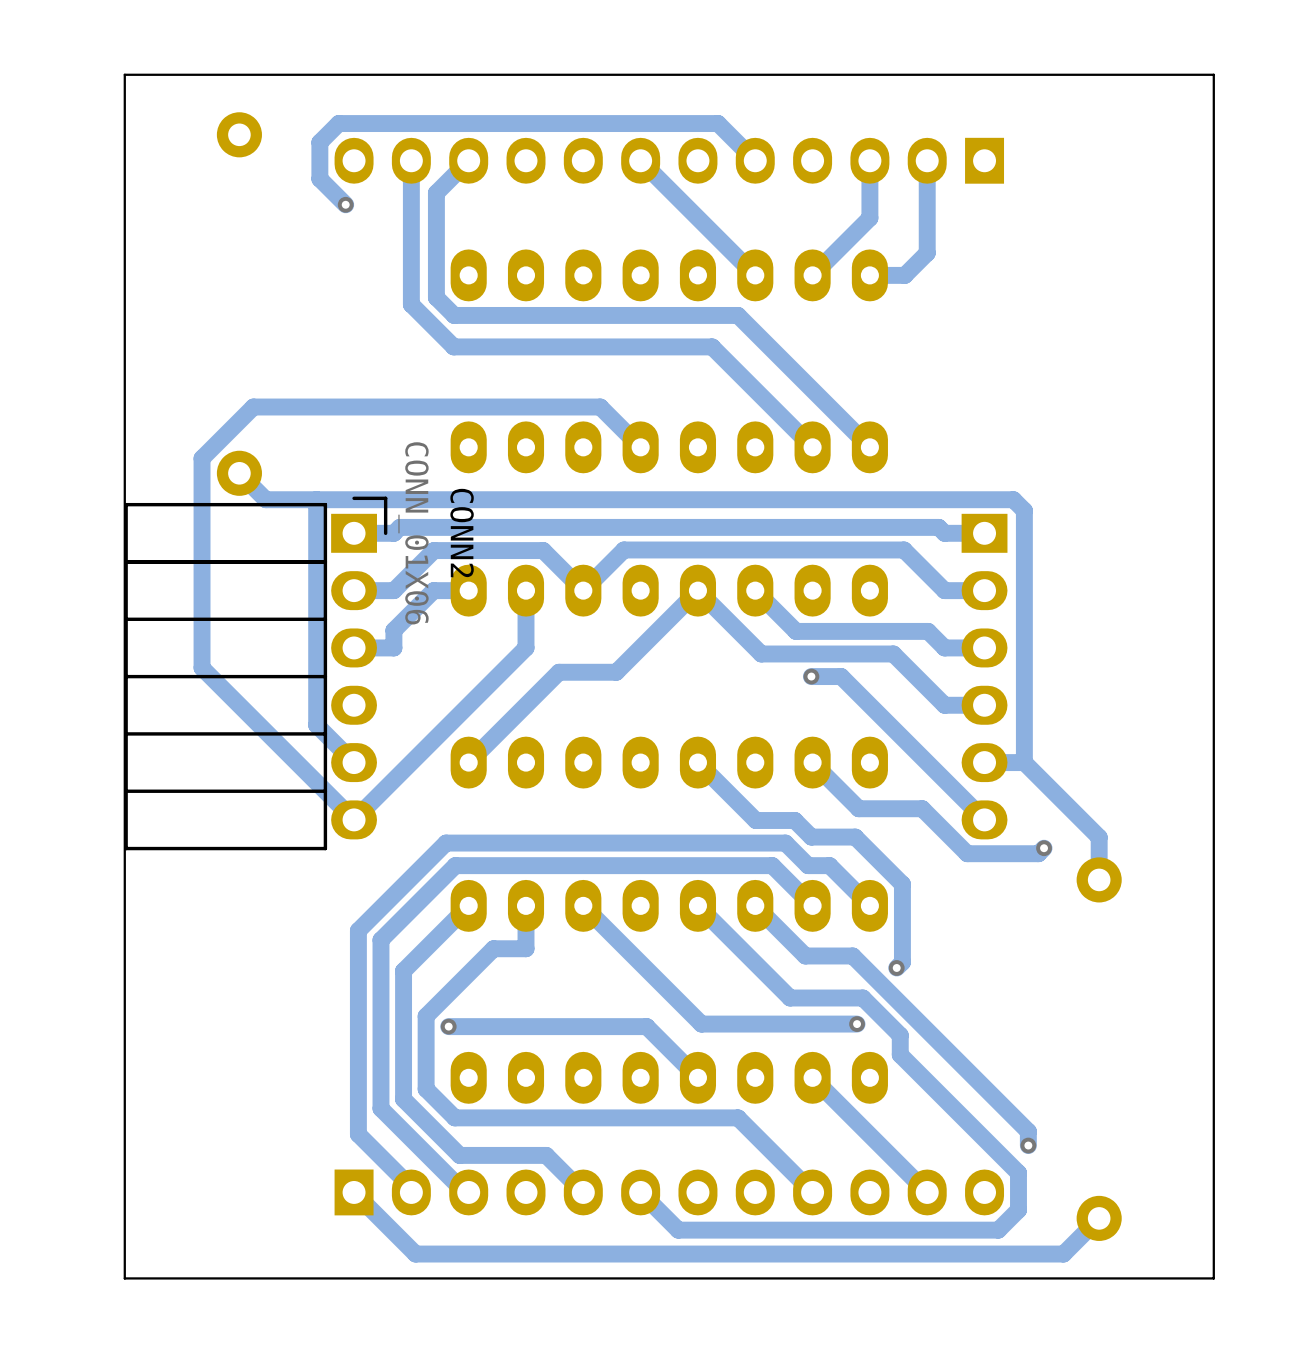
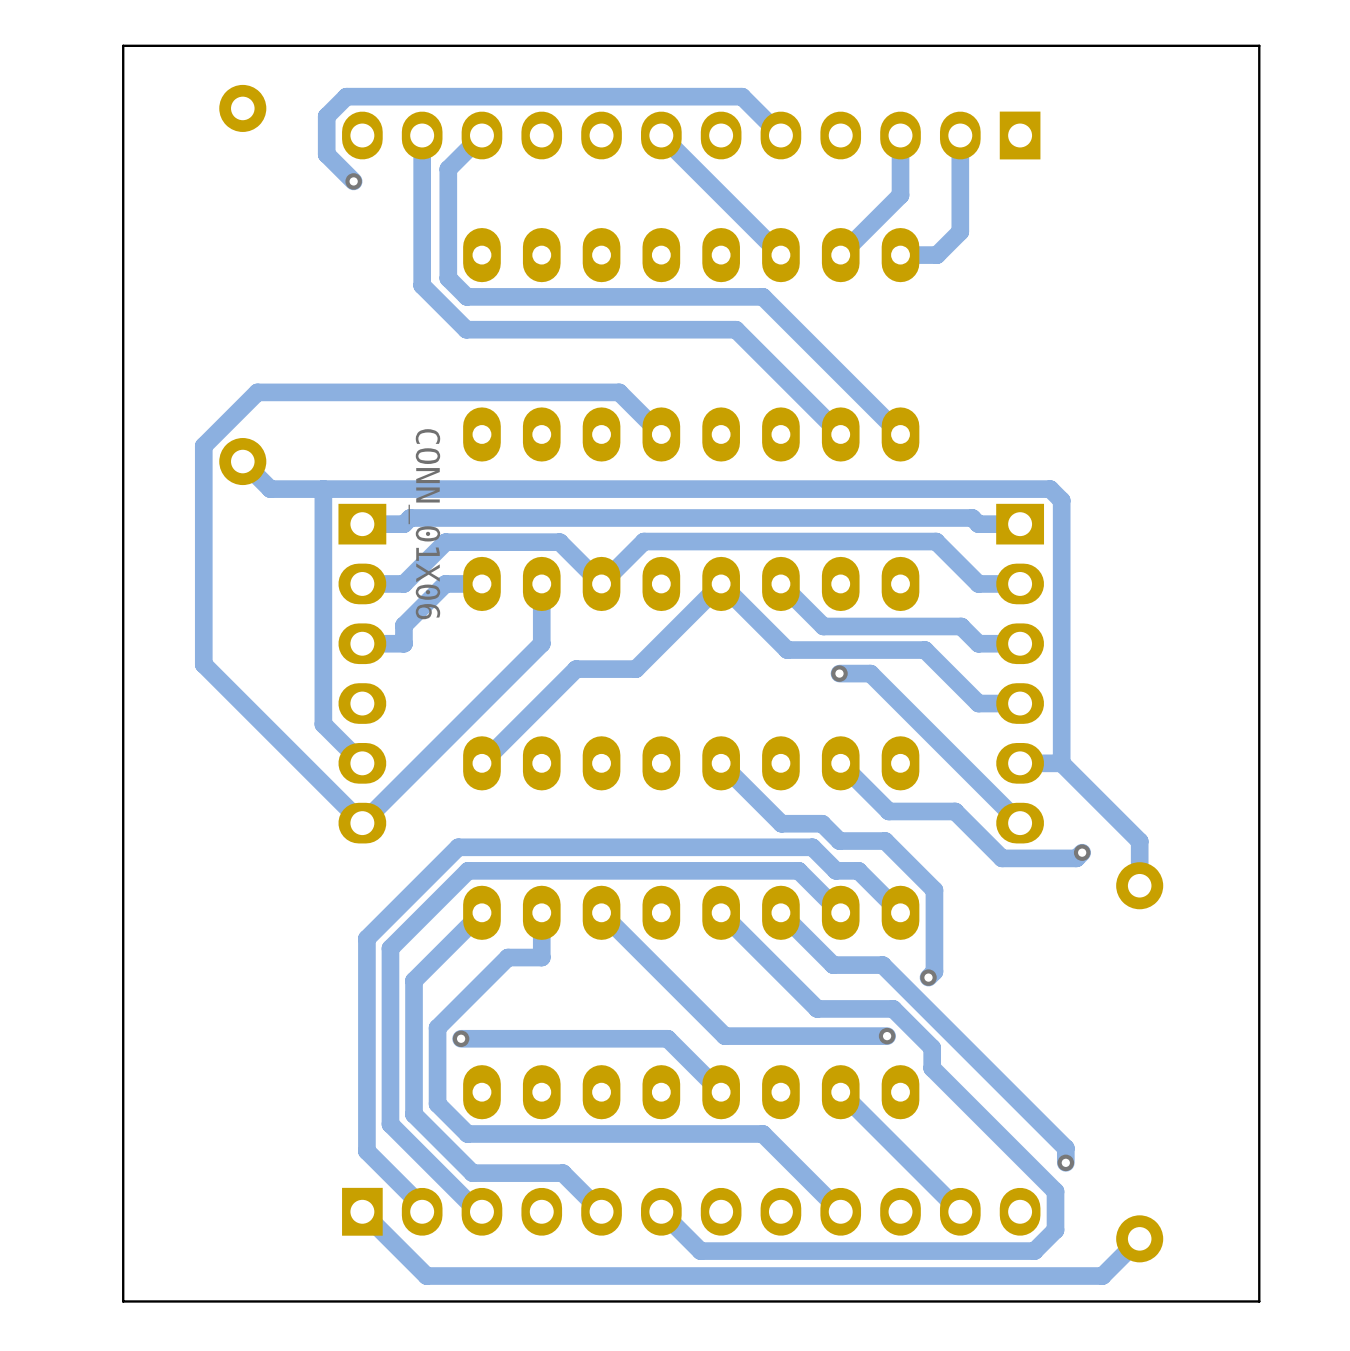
CONN2: CONN_01X06 (255, 673) -> none

